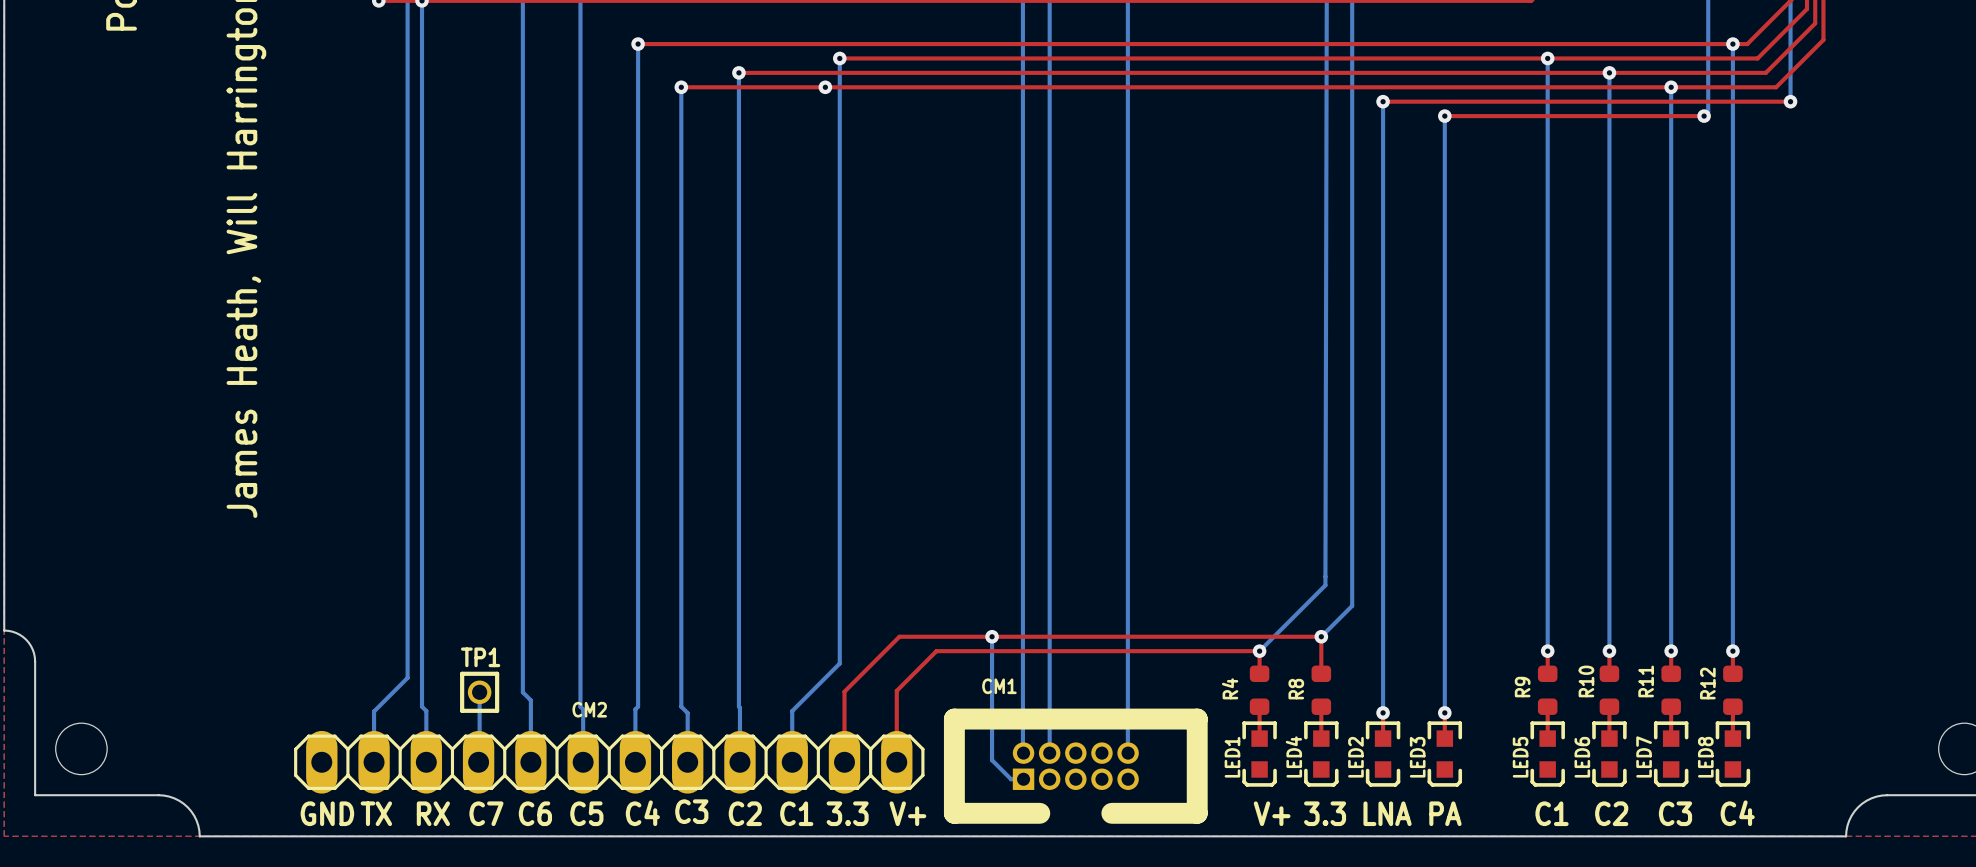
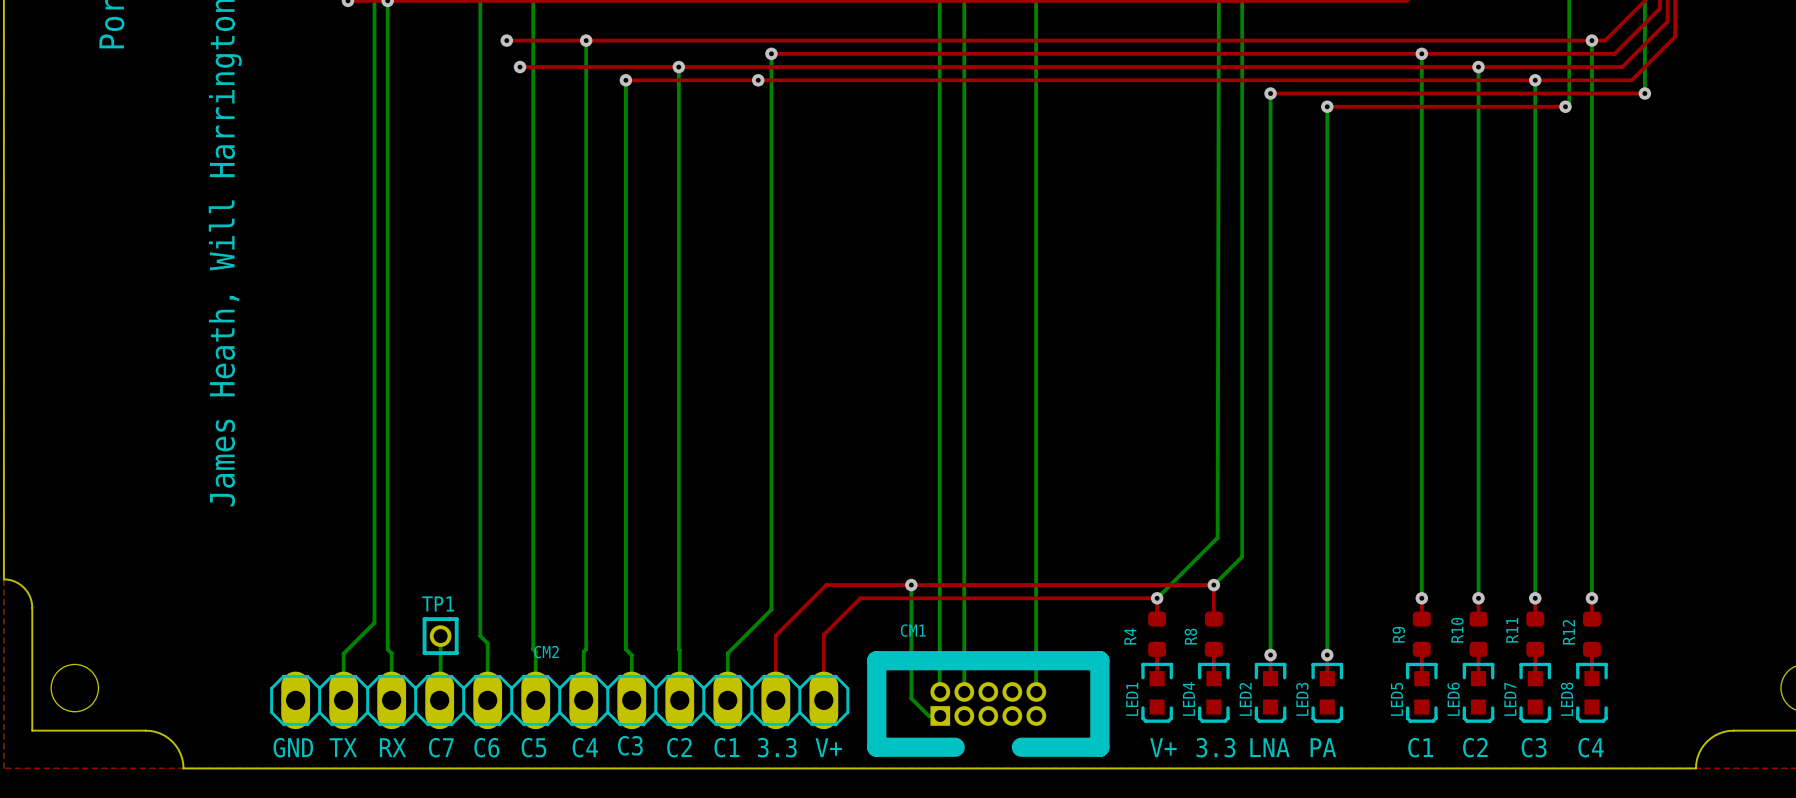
top track: none -> (506, 40) (586, 40)
via: none -> (506, 40)
top track: none -> (520, 67) (678, 67)
via: none -> (520, 67)

